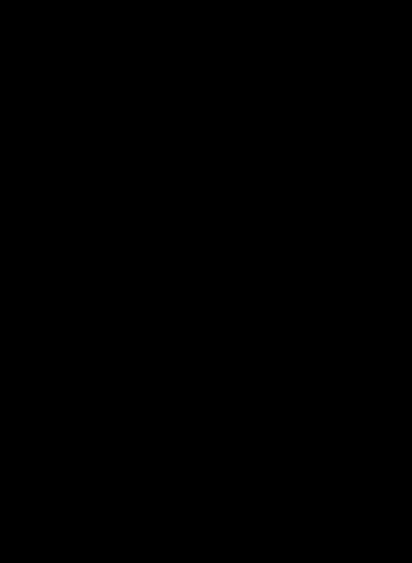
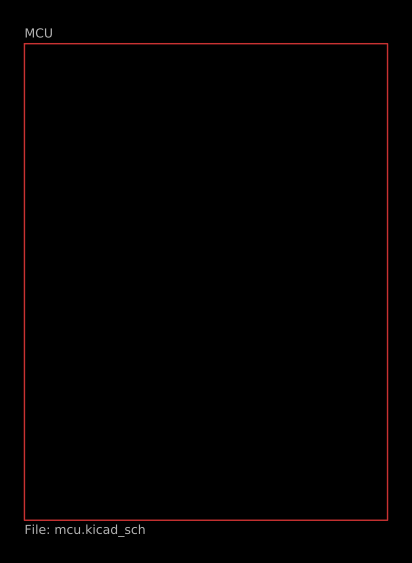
sheet MCU: none -> File: mcu.kicad_sch (205, 281)

